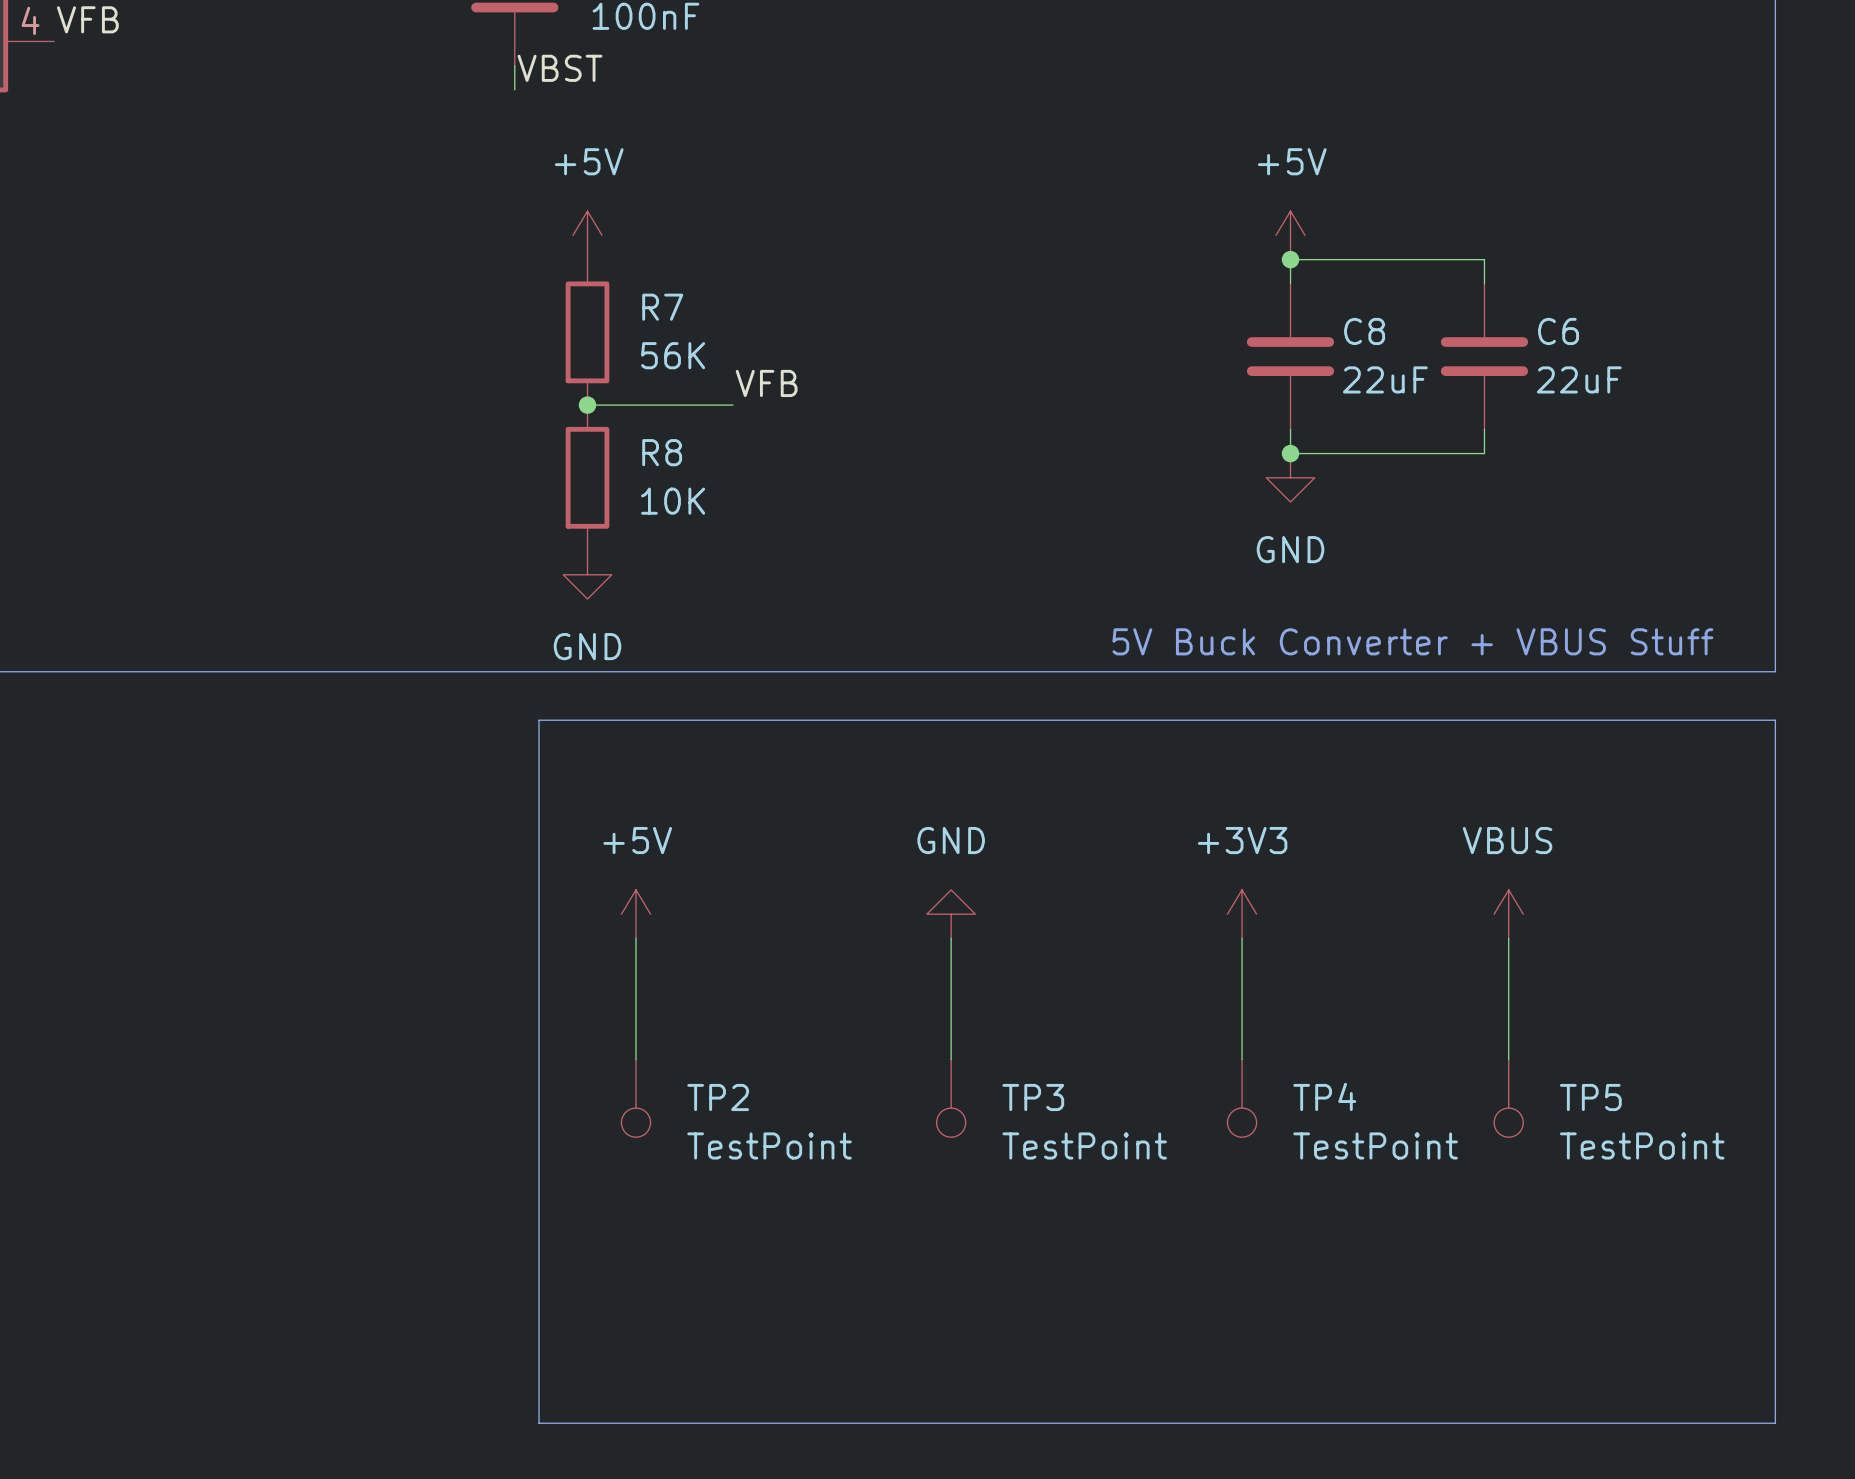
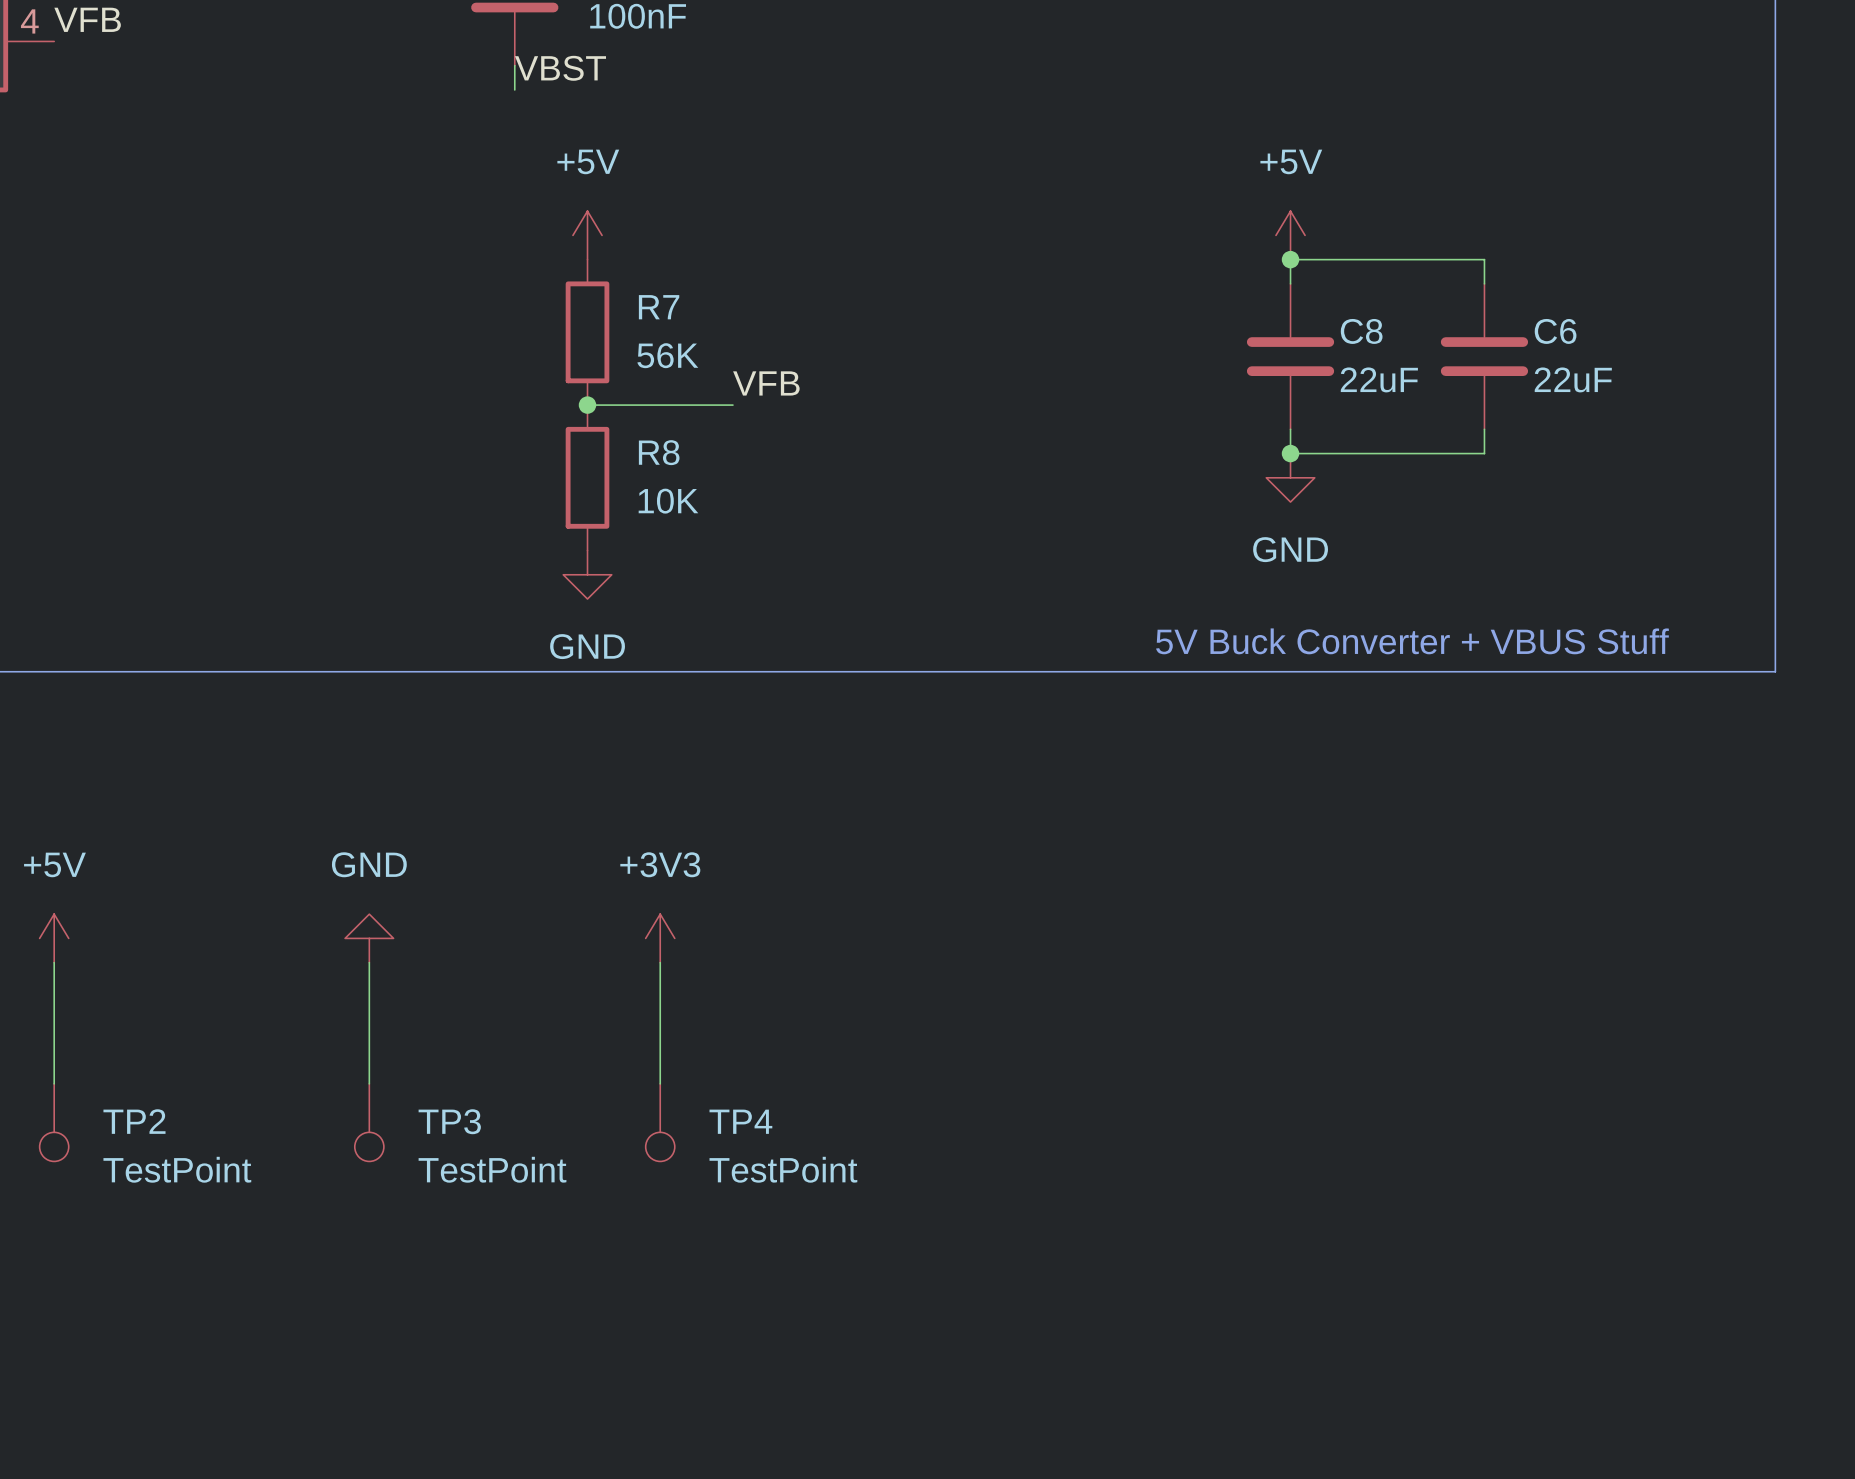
line: (539, 720) (1775, 720) (1775, 1423) (539, 1423) (539, 720) -> none
power symbol: +5V (635, 914) -> none
power symbol: GND (951, 914) -> none
power symbol: +3V3 (1242, 914) -> none
power symbol: VBUS (1508, 914) -> none
power symbol: none -> +5V (54, 938)
power symbol: none -> GND (369, 938)
wire: (635, 938) (635, 1059) -> (660, 962) (660, 1083)
power symbol: none -> +3V3 (660, 938)
wire: (951, 938) (951, 1059) -> none
wire: (1242, 938) (1242, 1059) -> none
wire: (1508, 938) (1508, 1059) -> none
wire: none -> (54, 962) (54, 1083)
wire: none -> (369, 962) (369, 1083)
TP2 position: (635, 1098) -> (54, 1122)
TP3 position: (951, 1098) -> (369, 1122)
TP4 position: (1242, 1098) -> (660, 1122)
TP5: TestPoint (1508, 1098) -> none

